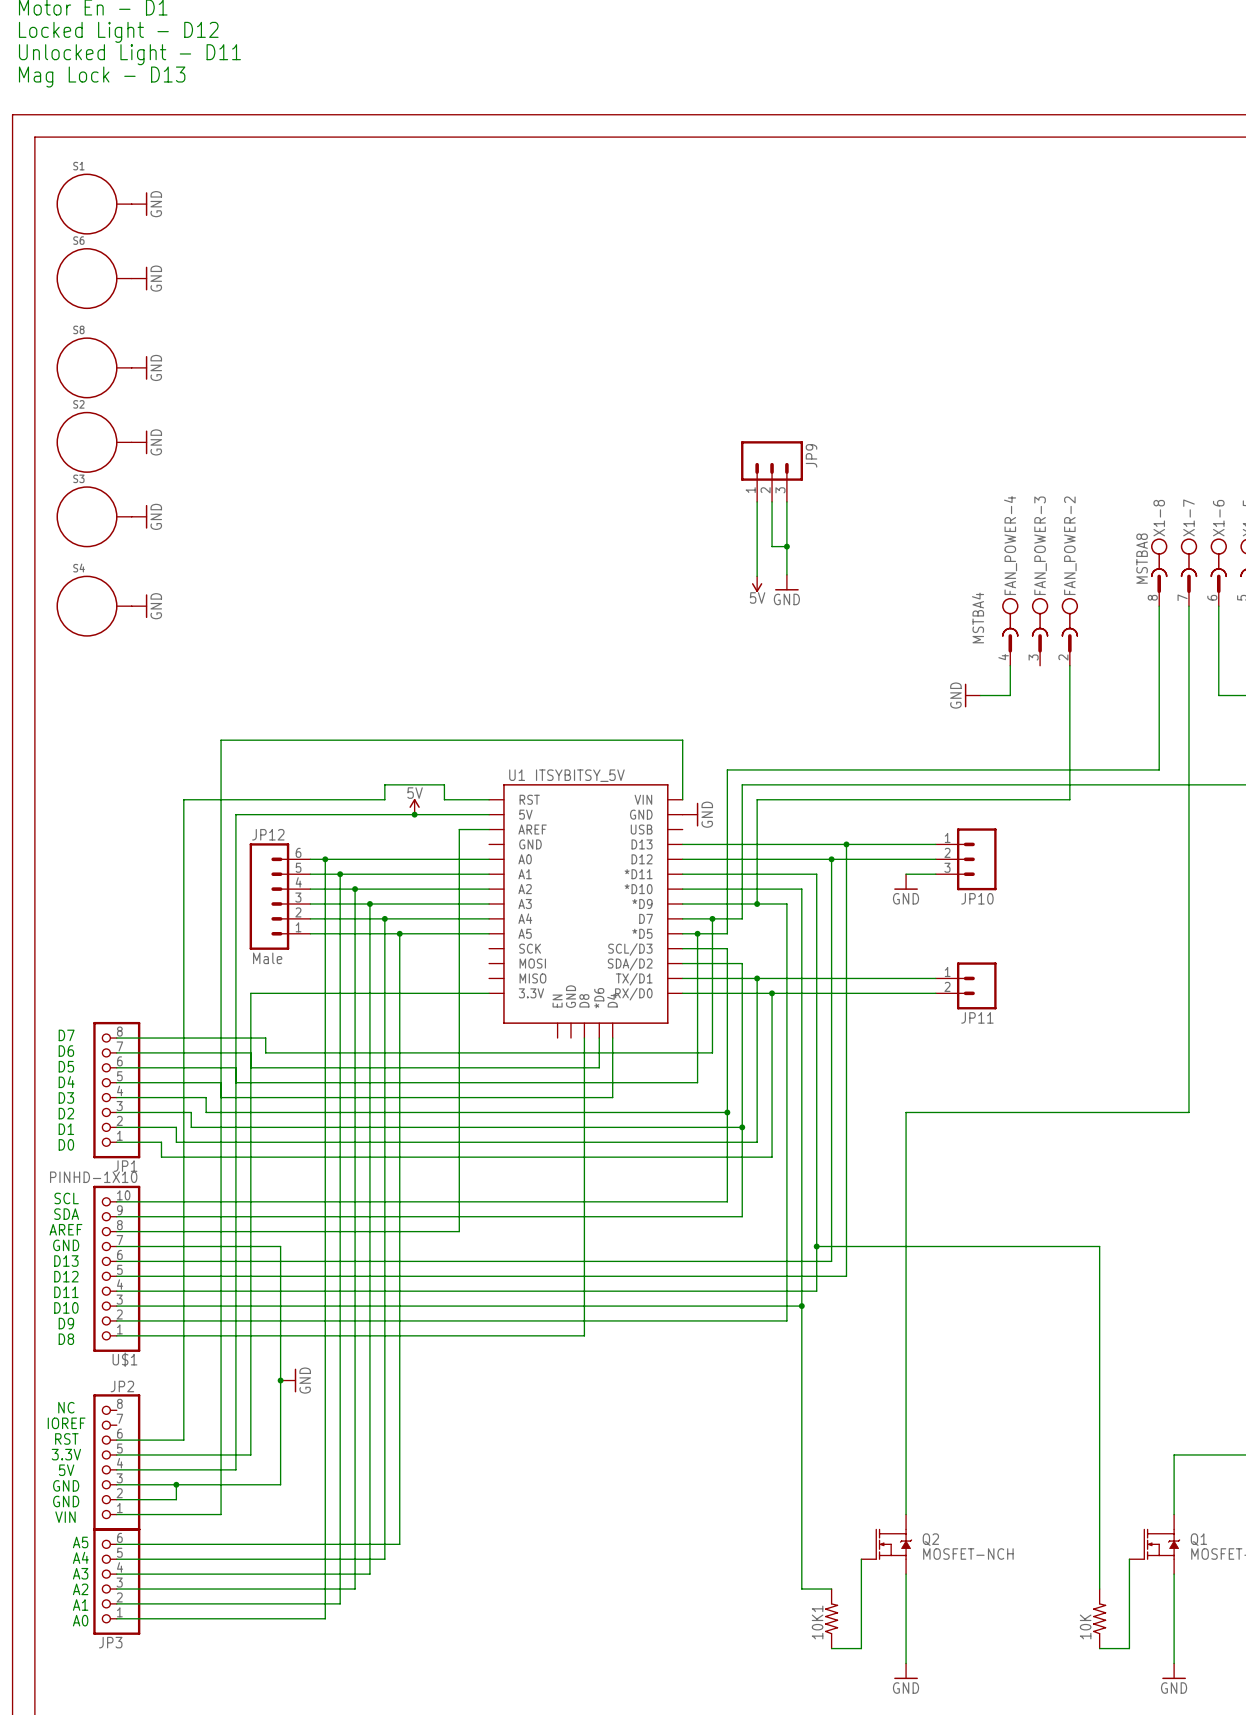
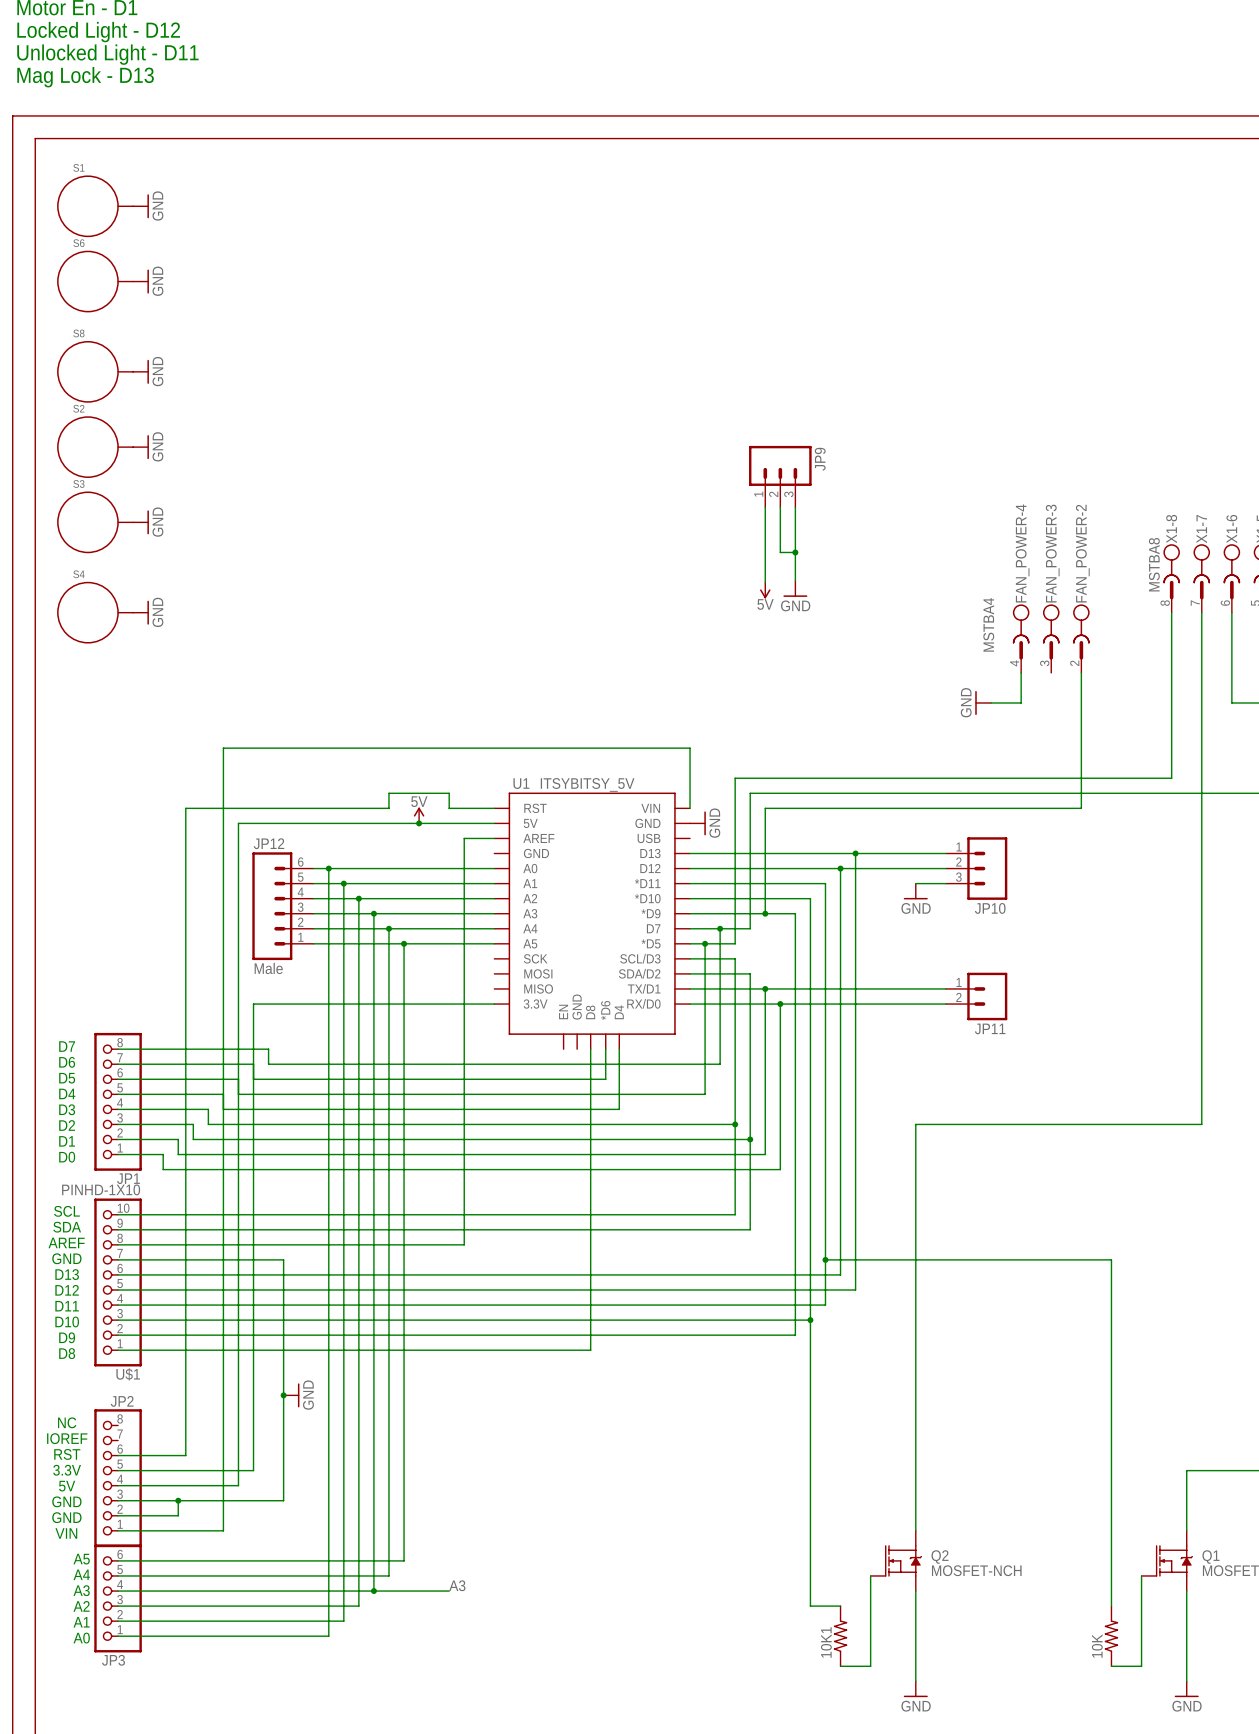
label: none -> A3 (457, 1585)
wire: none -> (373, 1591) (449, 1591)
junction: none -> (373, 1591)

